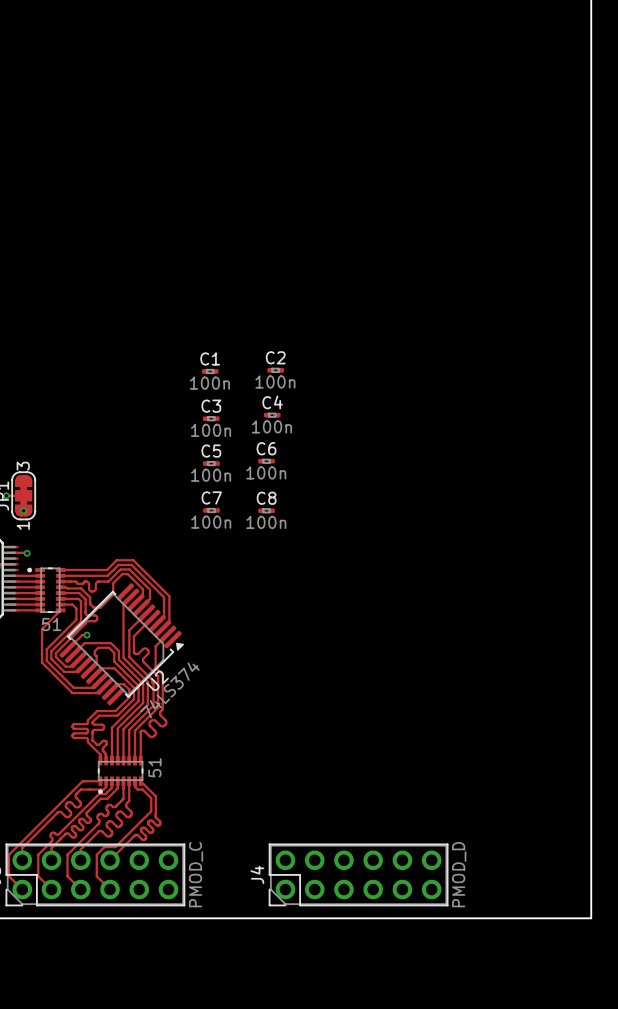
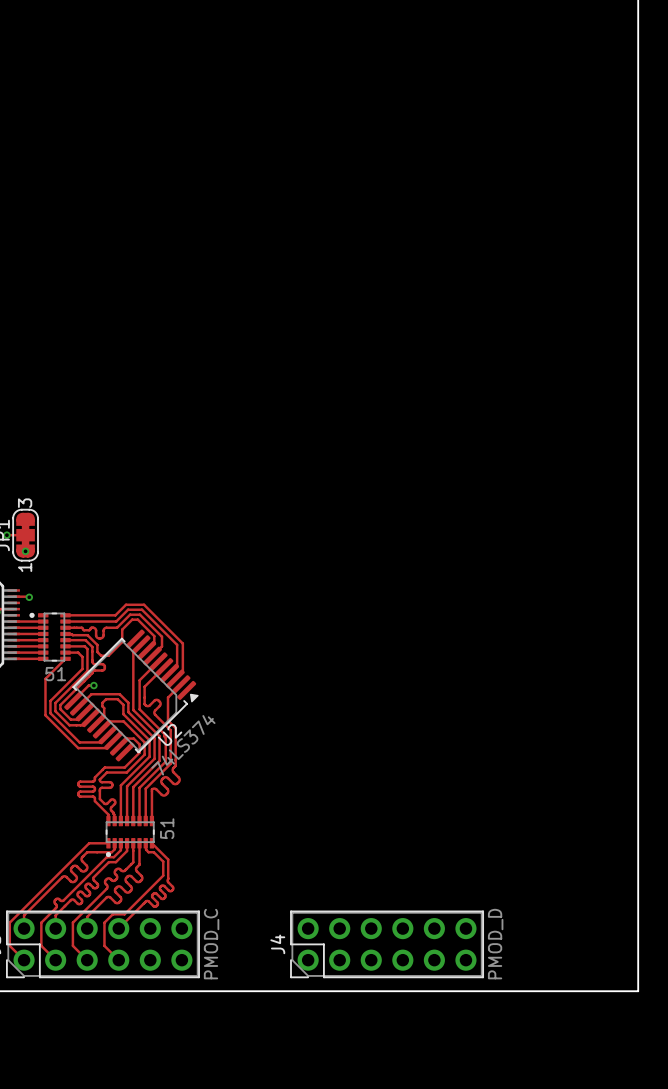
C2: 100n (275, 370) -> none
C1: 100n (210, 371) -> none
C4: 100n (272, 415) -> none
C3: 100n (211, 418) -> none
C6: 100n (266, 461) -> none
C5: 100n (211, 463) -> none
C7: 100n (211, 510) -> none
C8: 100n (266, 510) -> none

